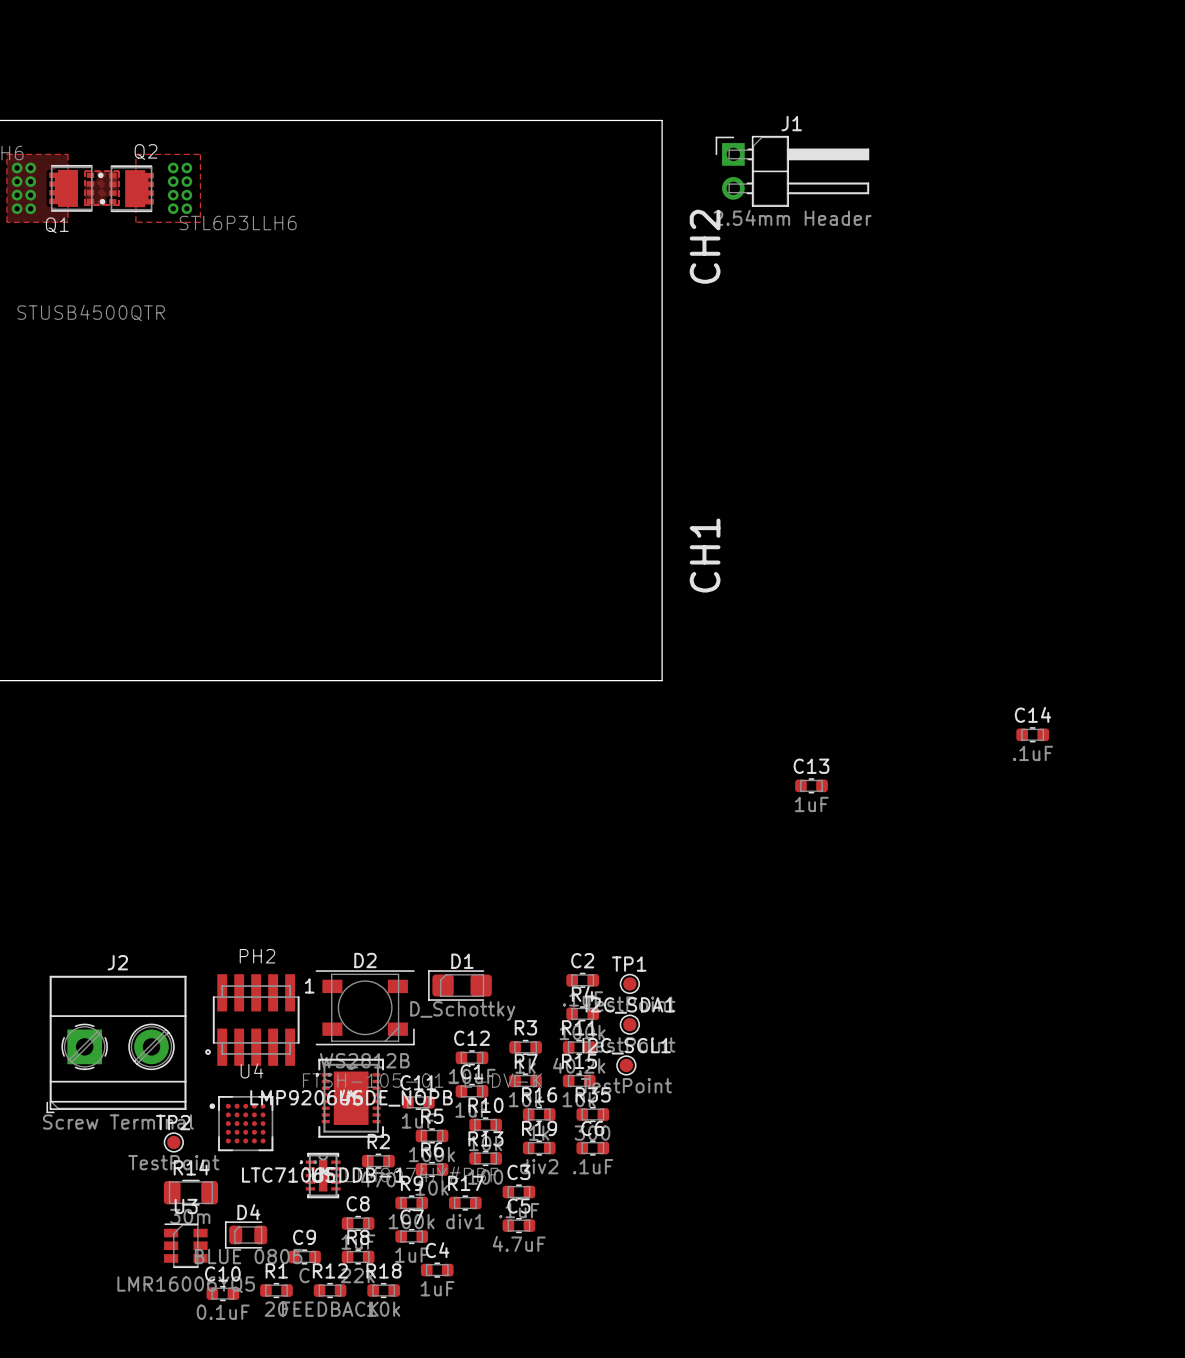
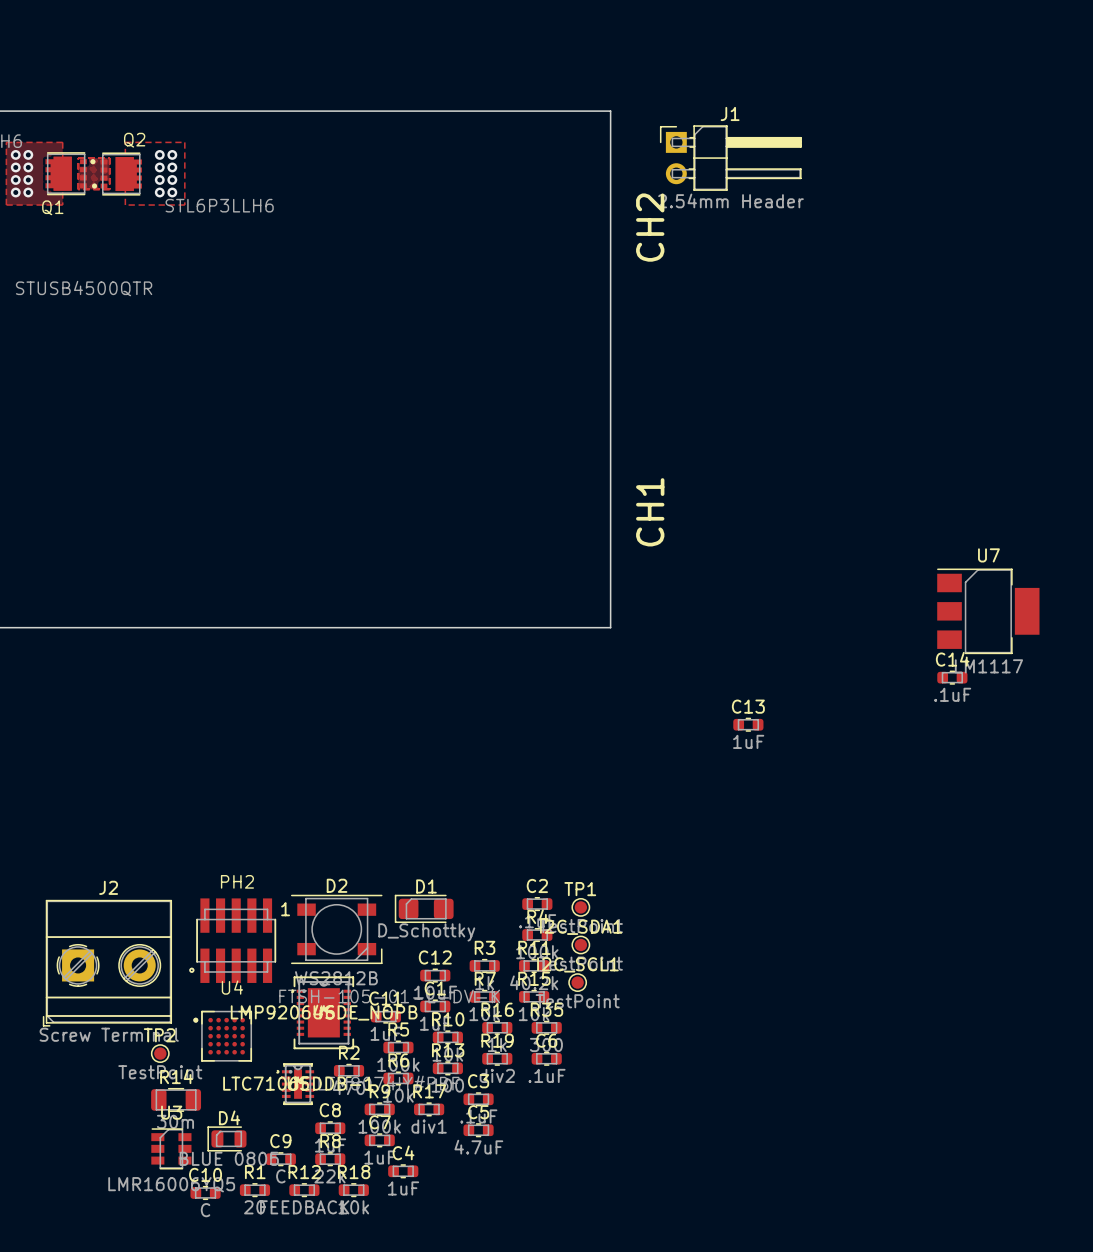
U7: none -> LM1117 (988, 611)
C10 value: 0.1uF (223, 1312) -> C (205, 1210)

